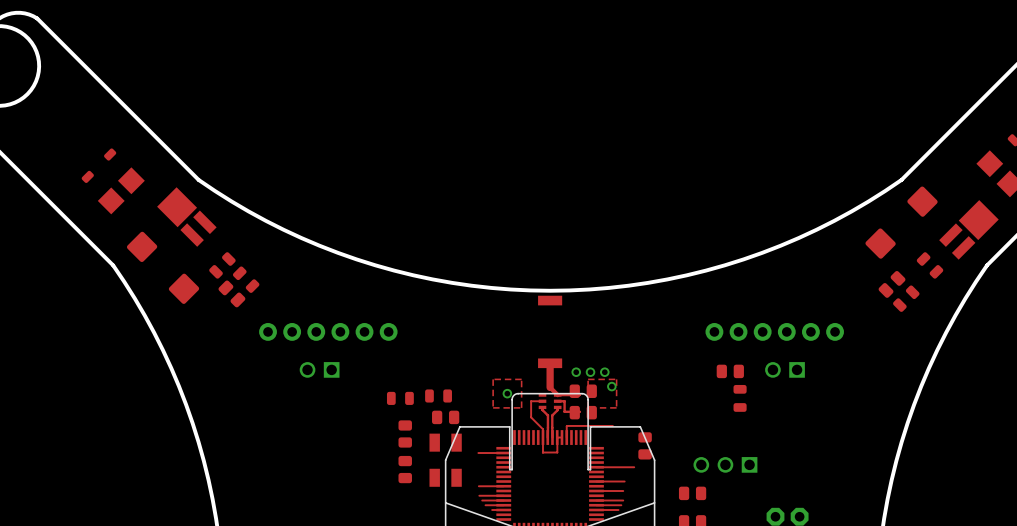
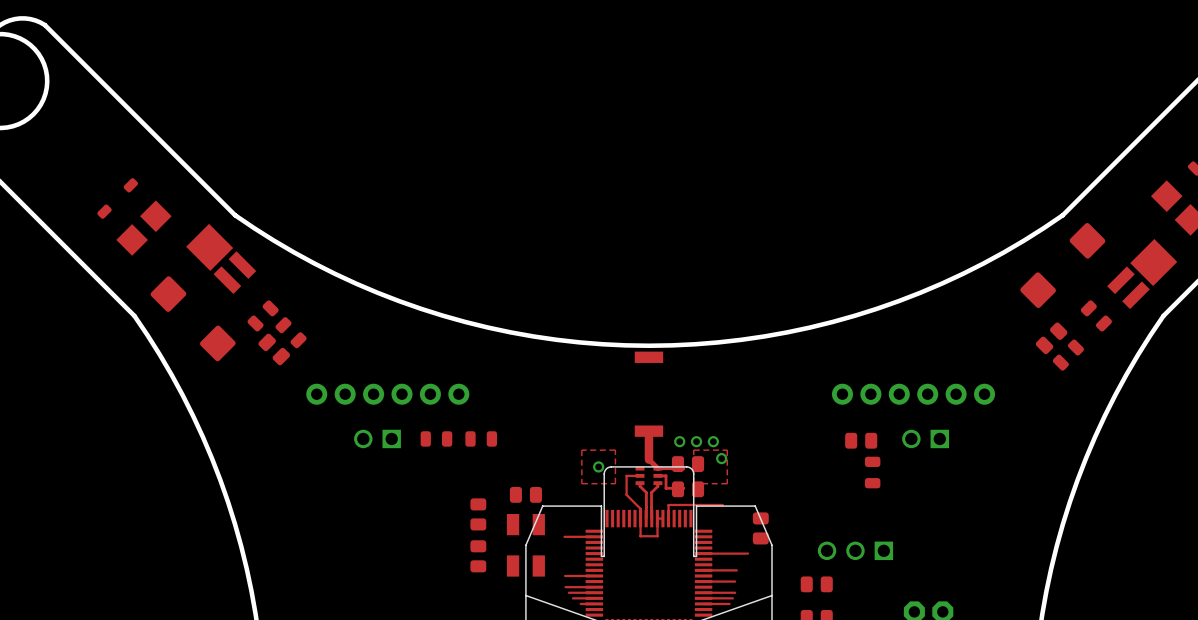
part: none -> (436, 438)
part: none -> (481, 438)
part: (438, 395) -> none
part: (400, 398) -> none

